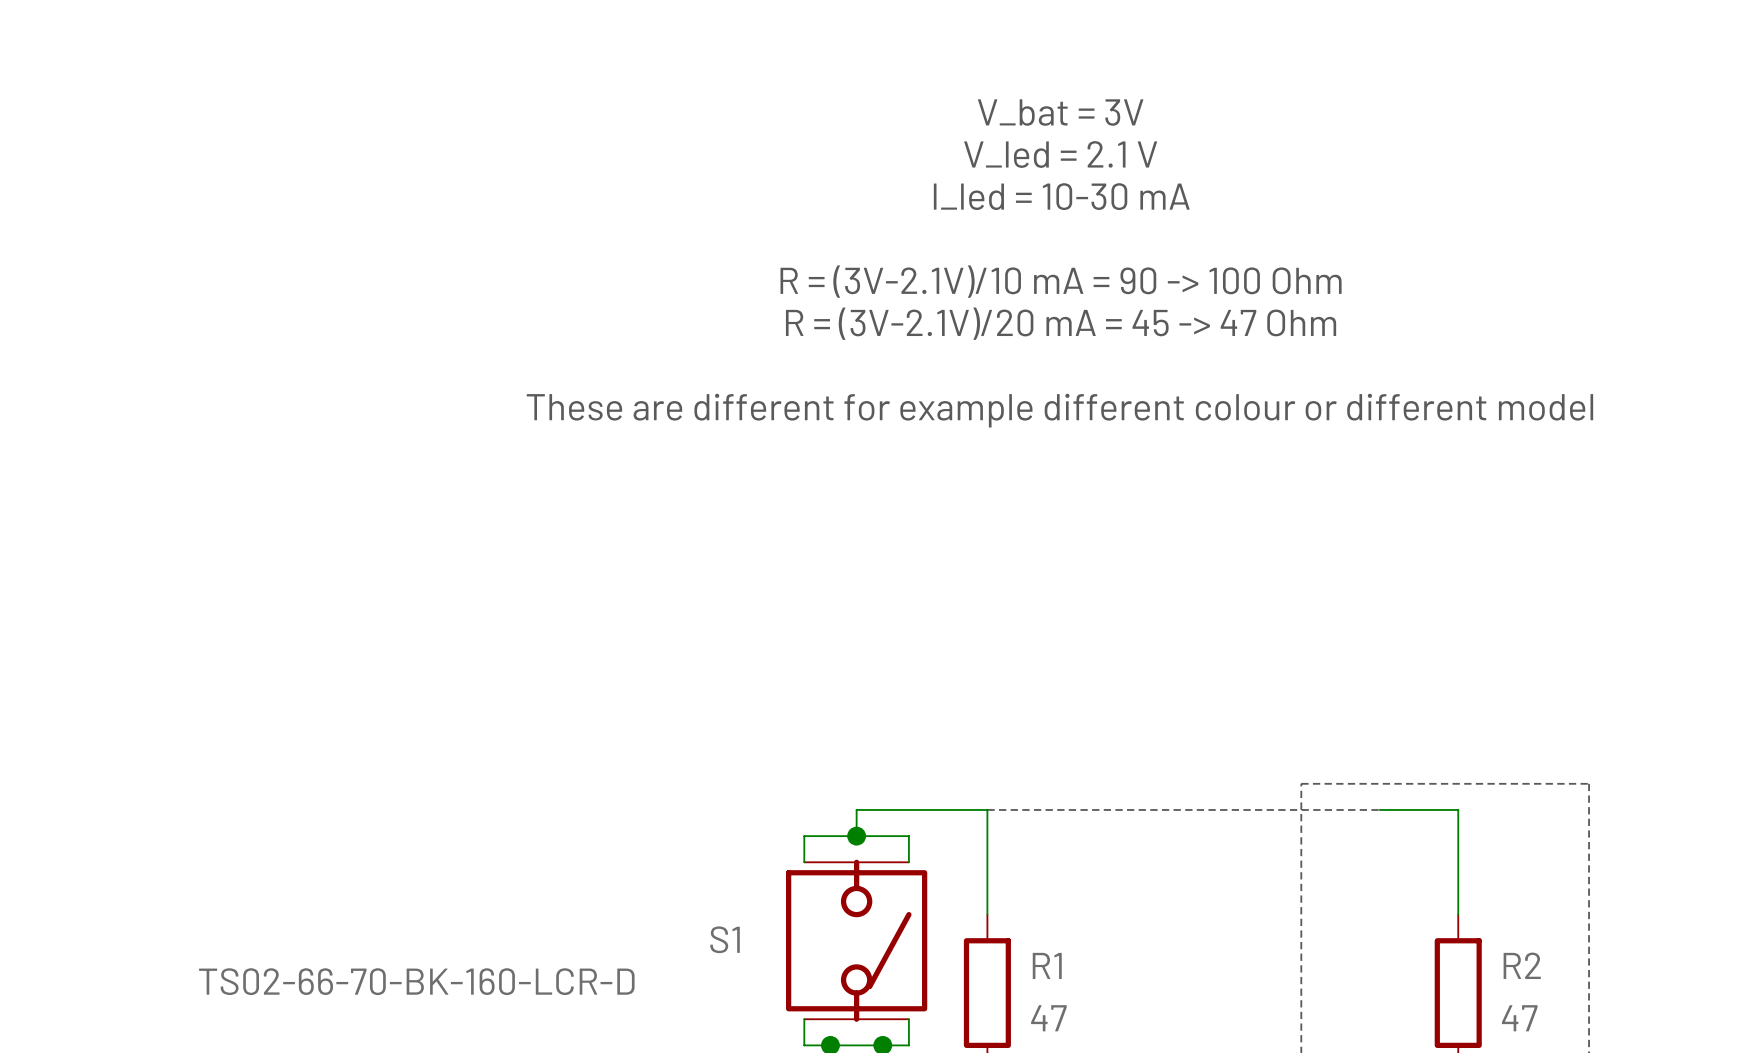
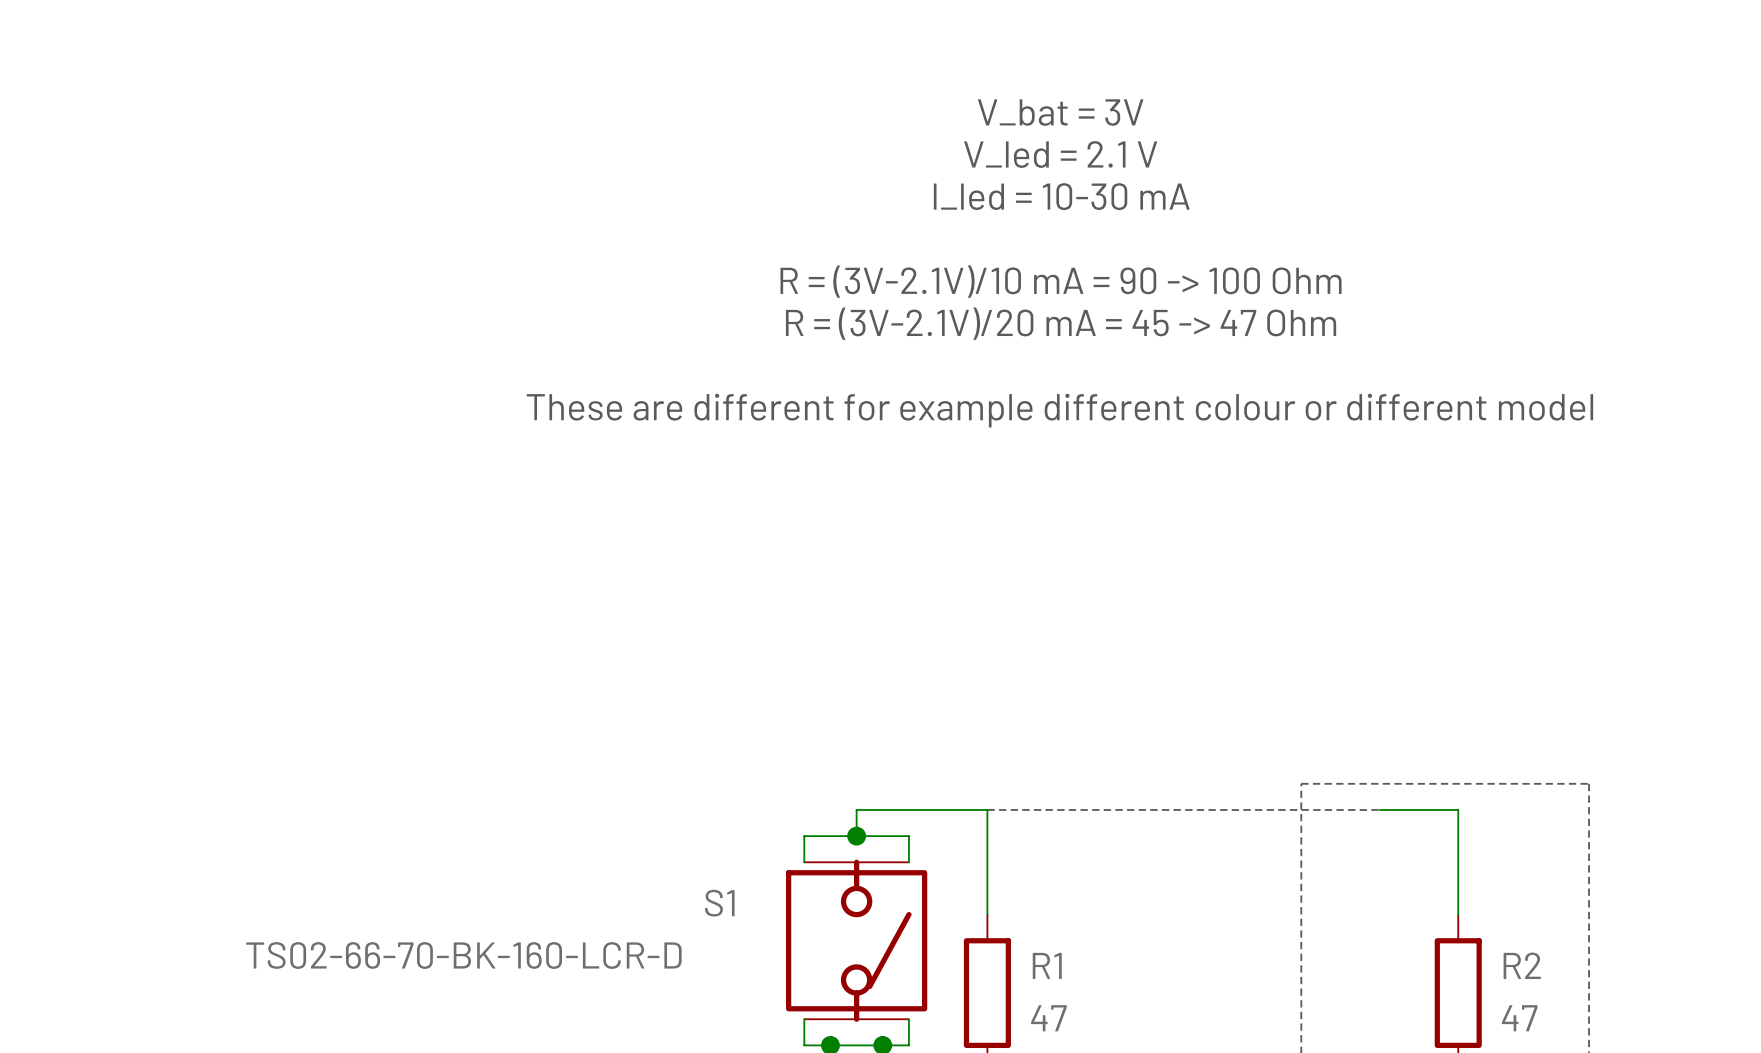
S1 name position: S1 (725, 939) -> S1 (719, 903)
S1 value position: TS02-66-70-BK-160-LCR-D (416, 981) -> TS02-66-70-BK-160-LCR-D (463, 955)

